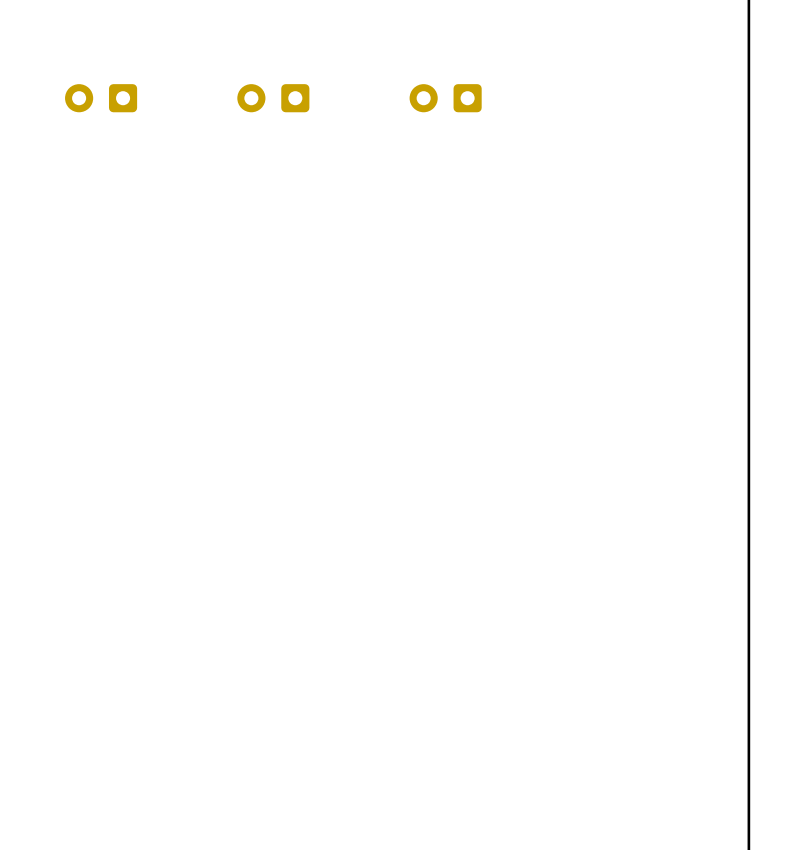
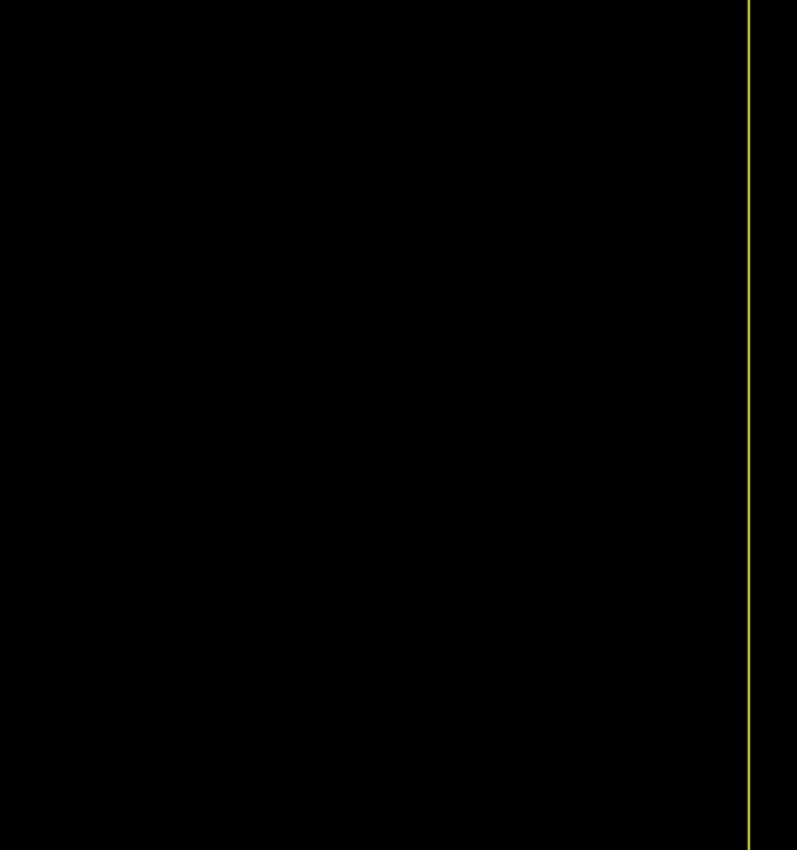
part: (101, 98) -> none
part: (273, 98) -> none
part: (445, 98) -> none

